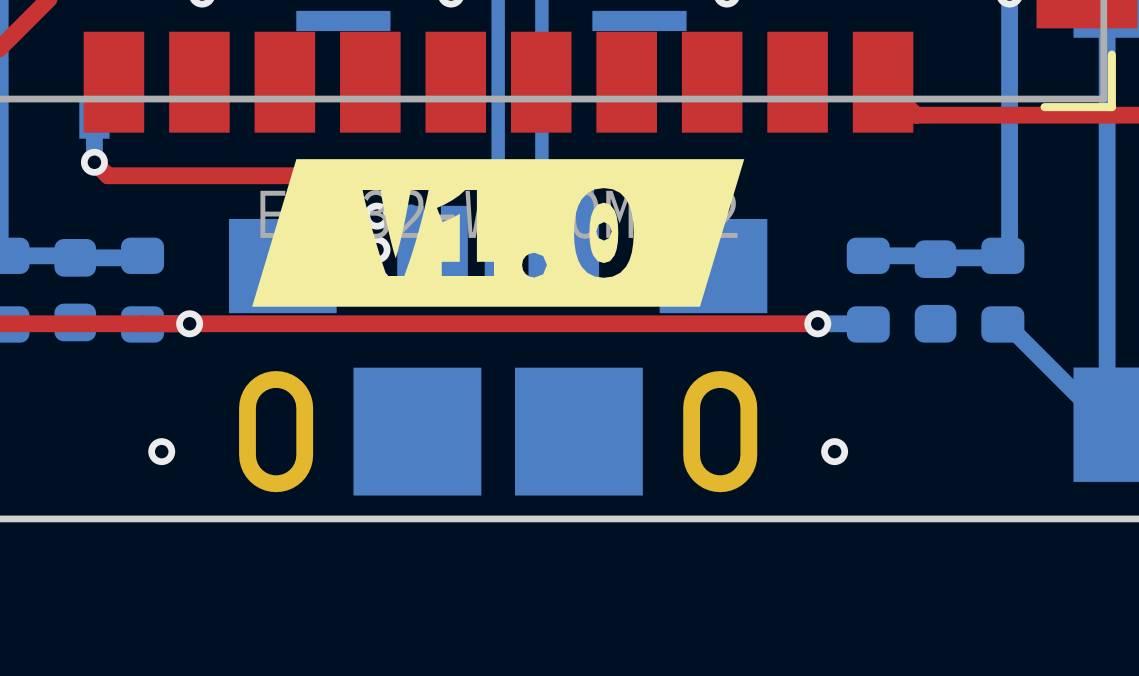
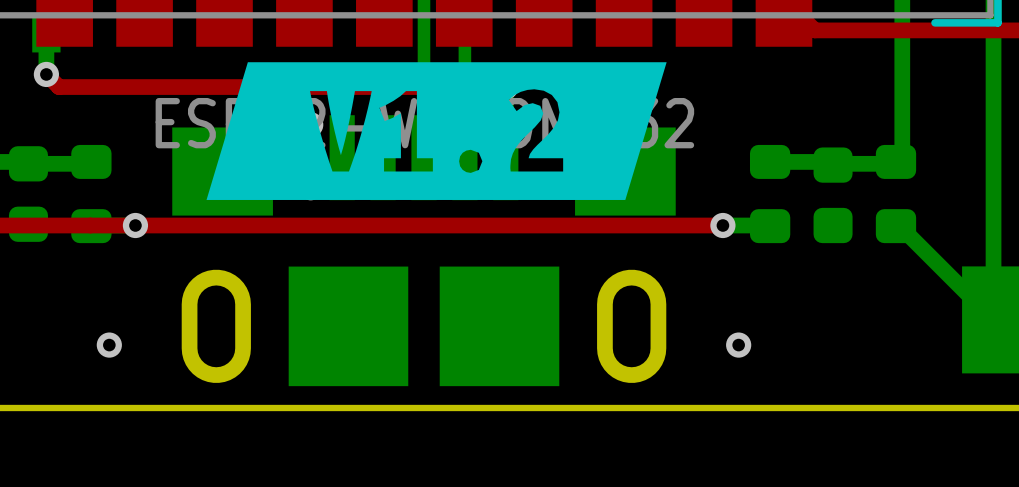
drawing shape: [252, 159, 745, 307] -> [206, 62, 667, 200]

